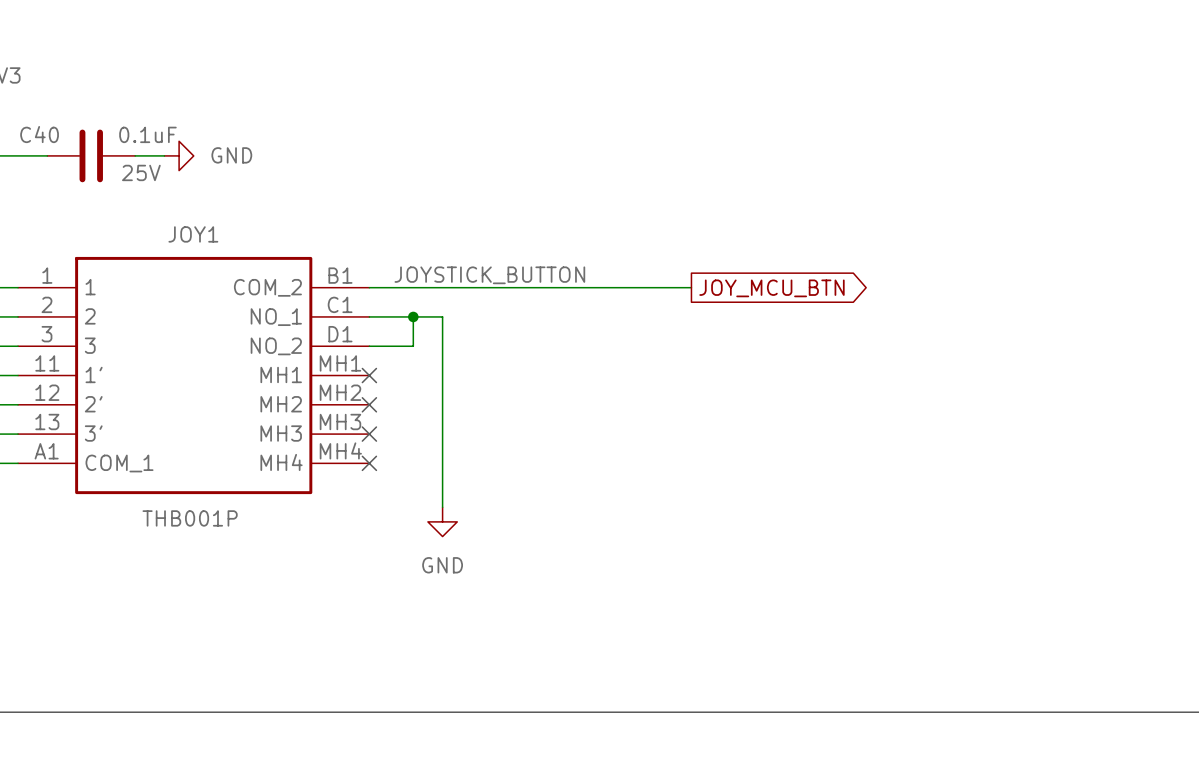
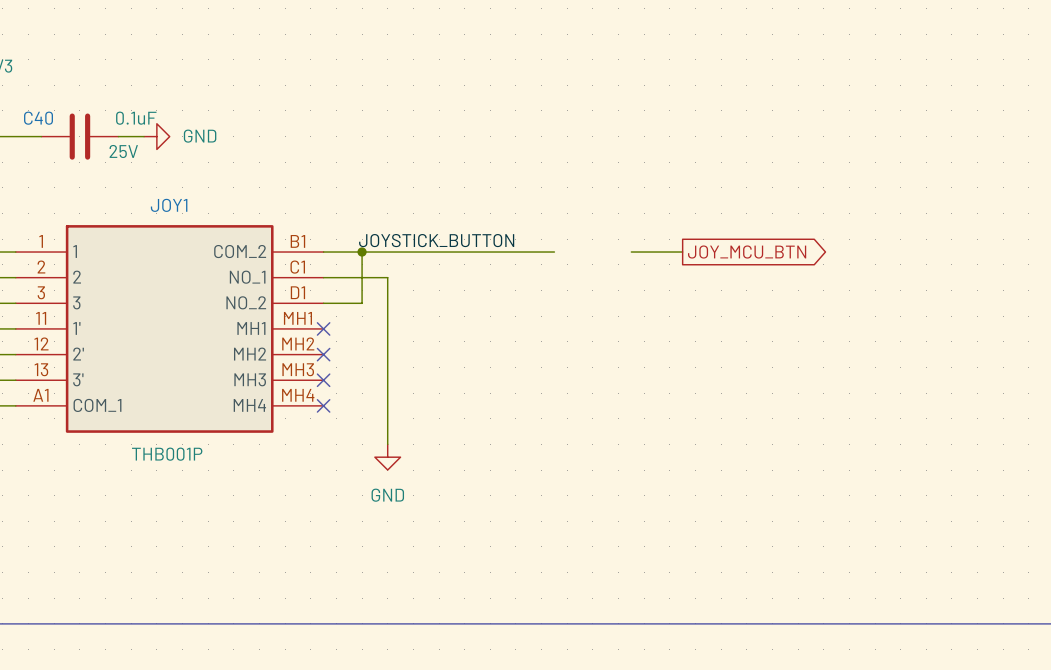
wire: none -> (362, 252) (362, 277)
wire: (632, 287) (691, 287) -> (631, 252) (682, 252)
global label position: JOY_MCU_BTN (771, 288) -> JOY_MCU_BTN (747, 252)
junction position: (413, 316) -> (362, 252)

